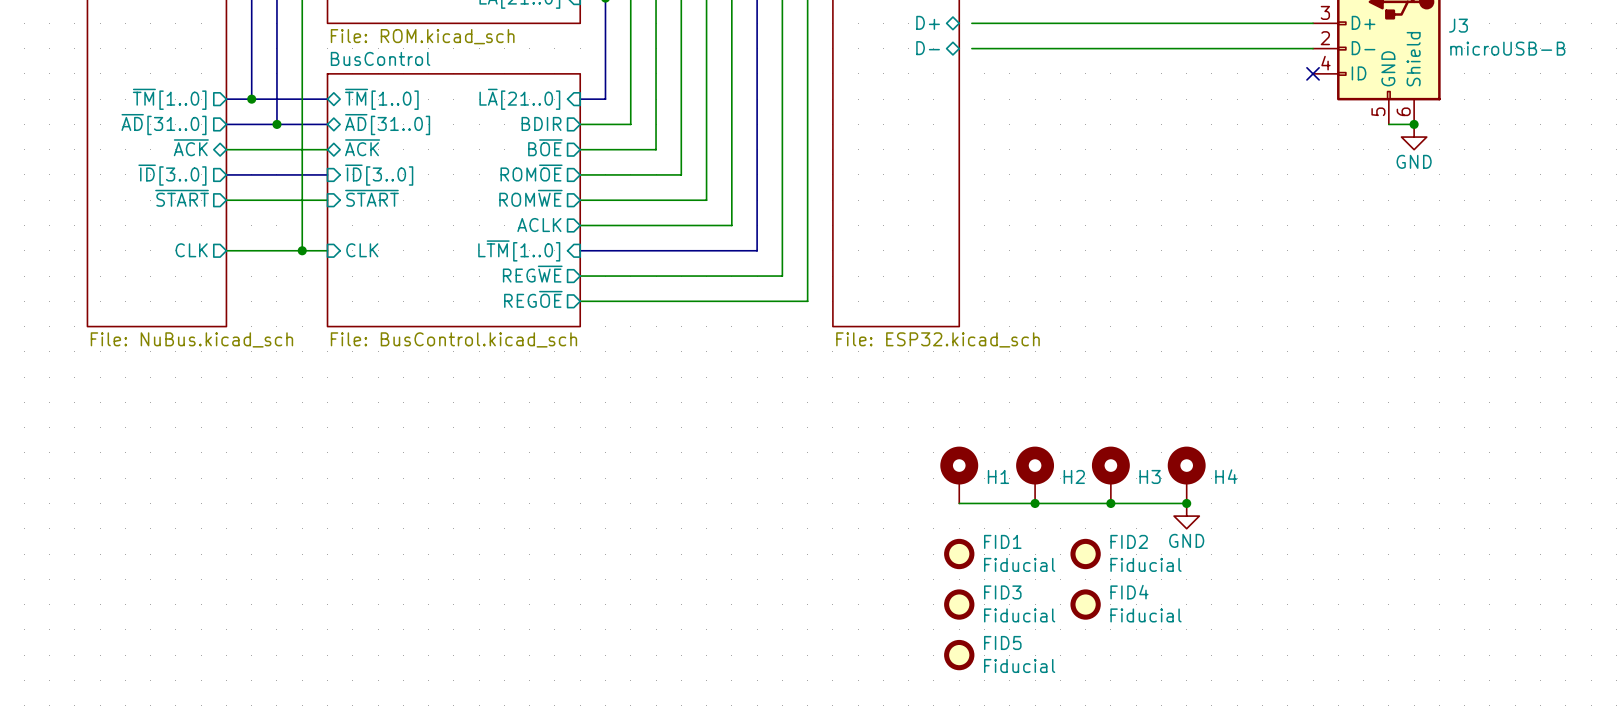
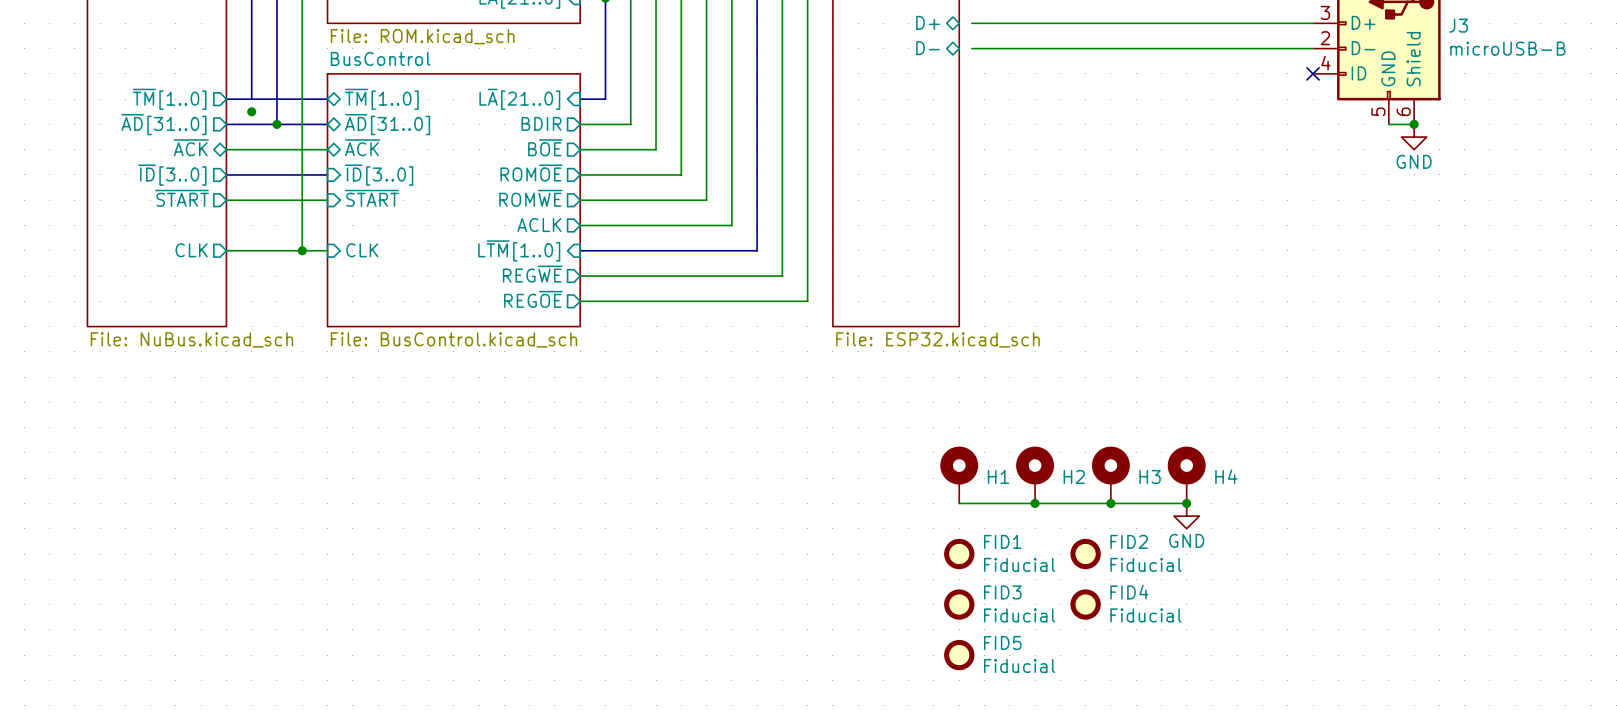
junction position: (251, 99) -> (251, 111)

